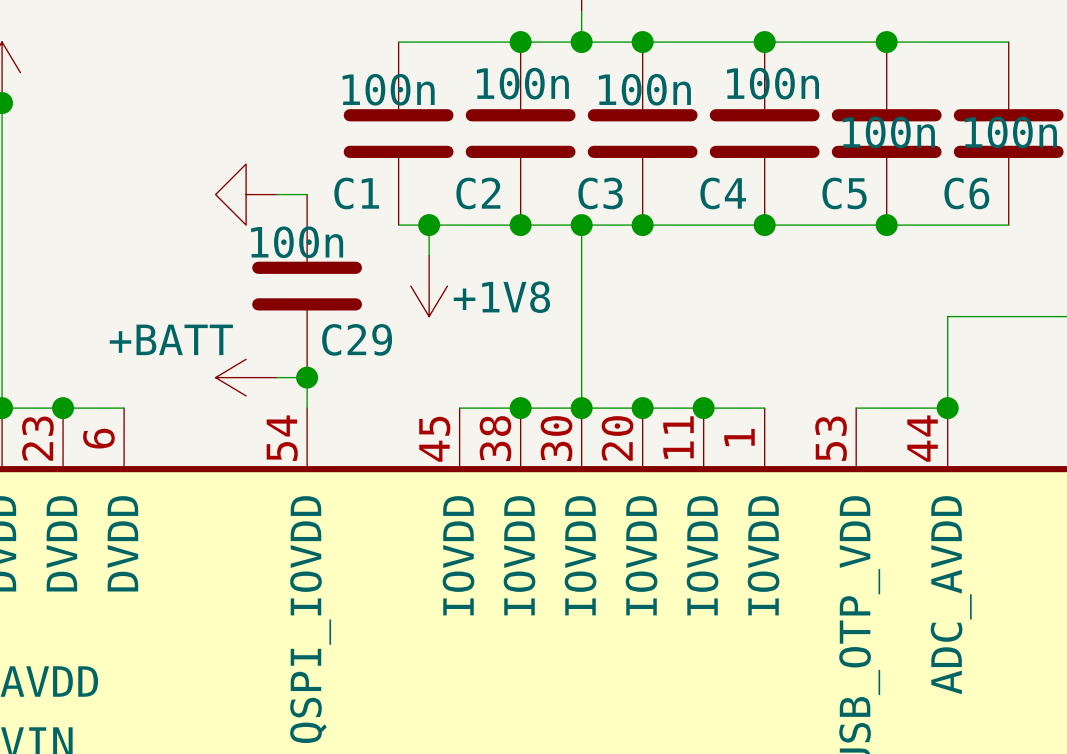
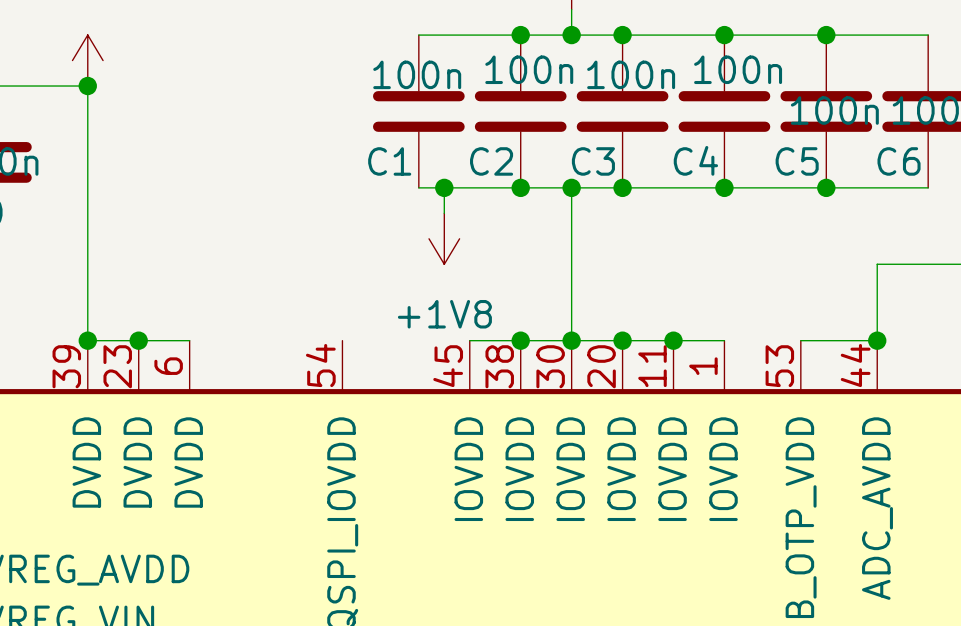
power symbol: (246, 194) -> none
wire: (276, 194) (307, 194) -> none
C29: 100n (307, 286) -> none
power symbol text position: +1V8 (501, 297) -> +1V8 (444, 314)
power symbol: +BATT (246, 377) -> none
wire: (276, 377) (307, 377) (307, 408) -> none
junction: (307, 377) -> none

